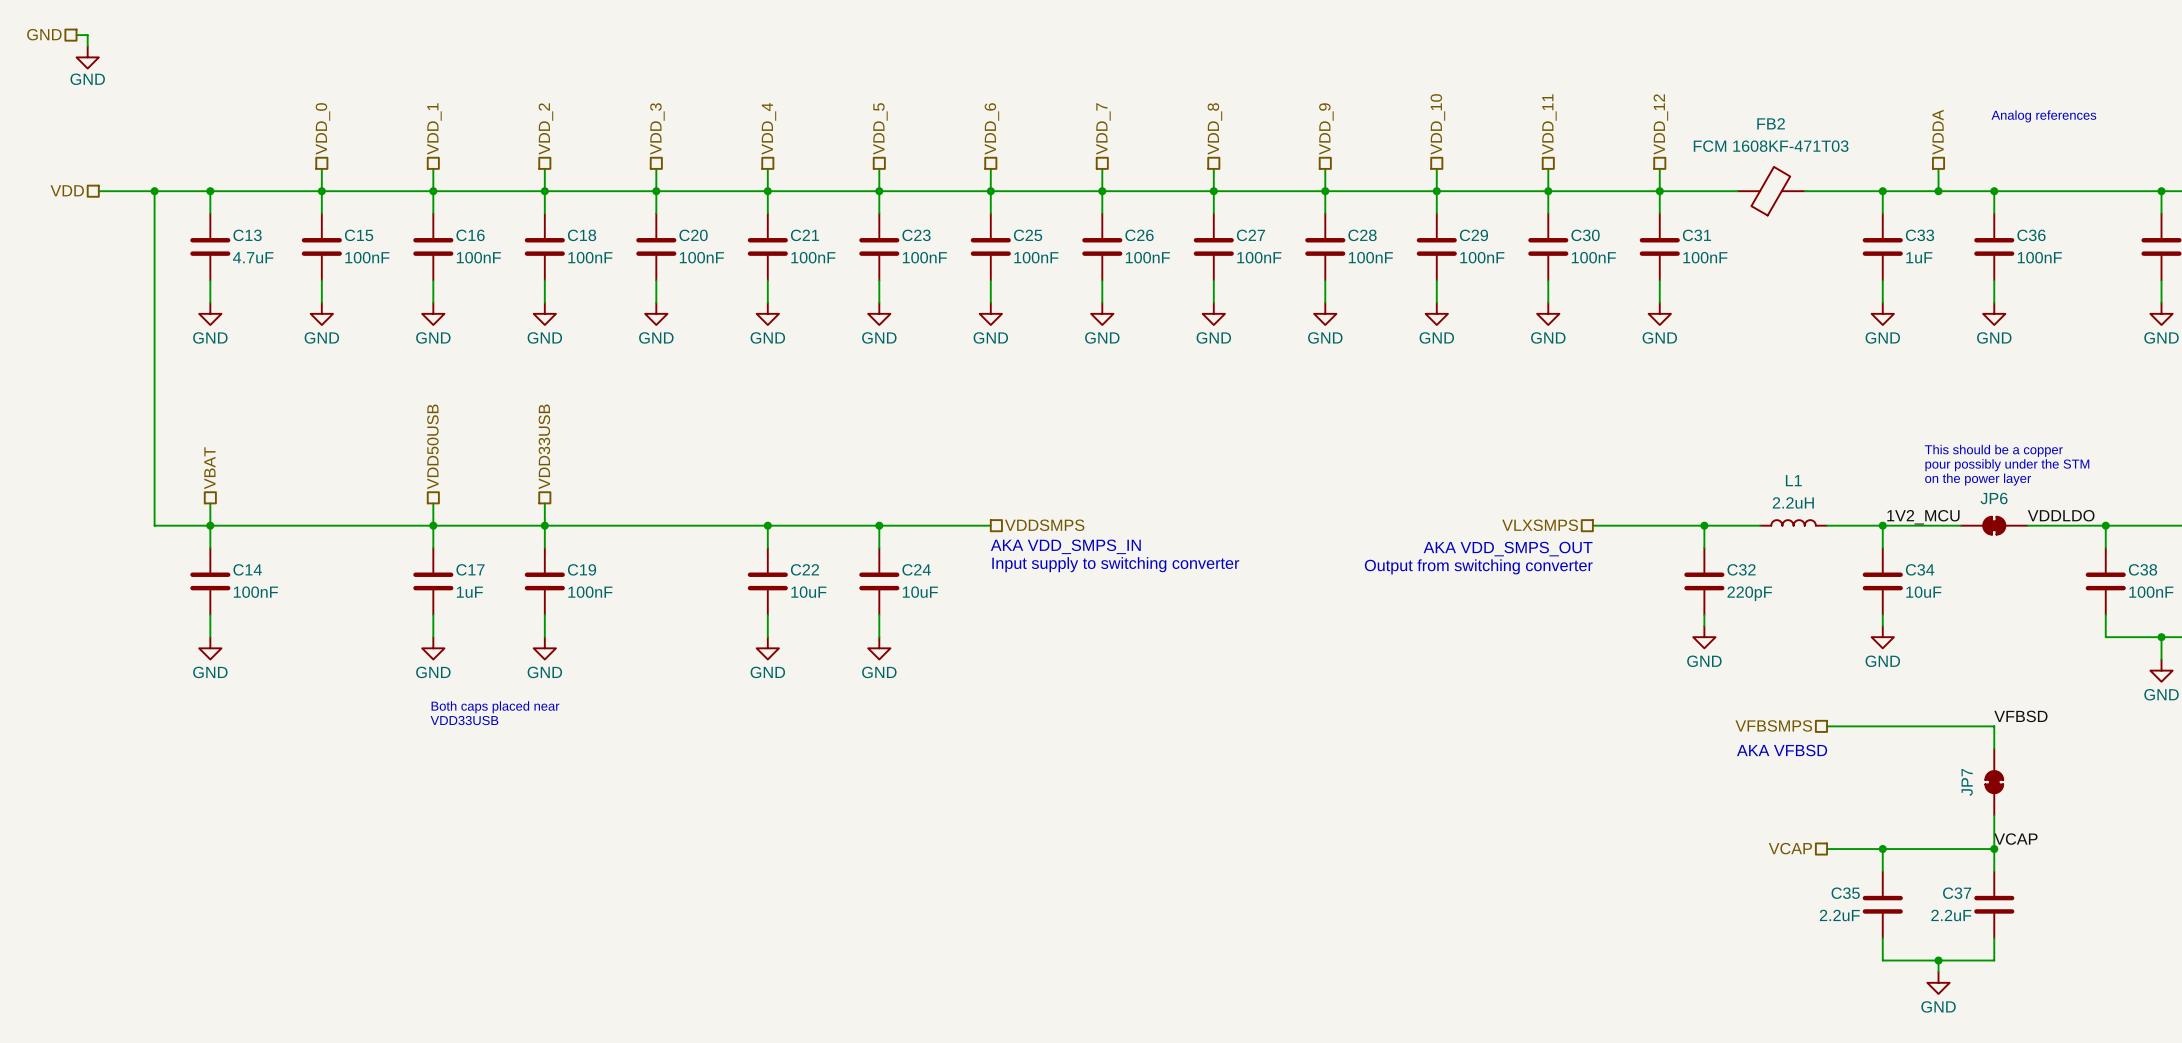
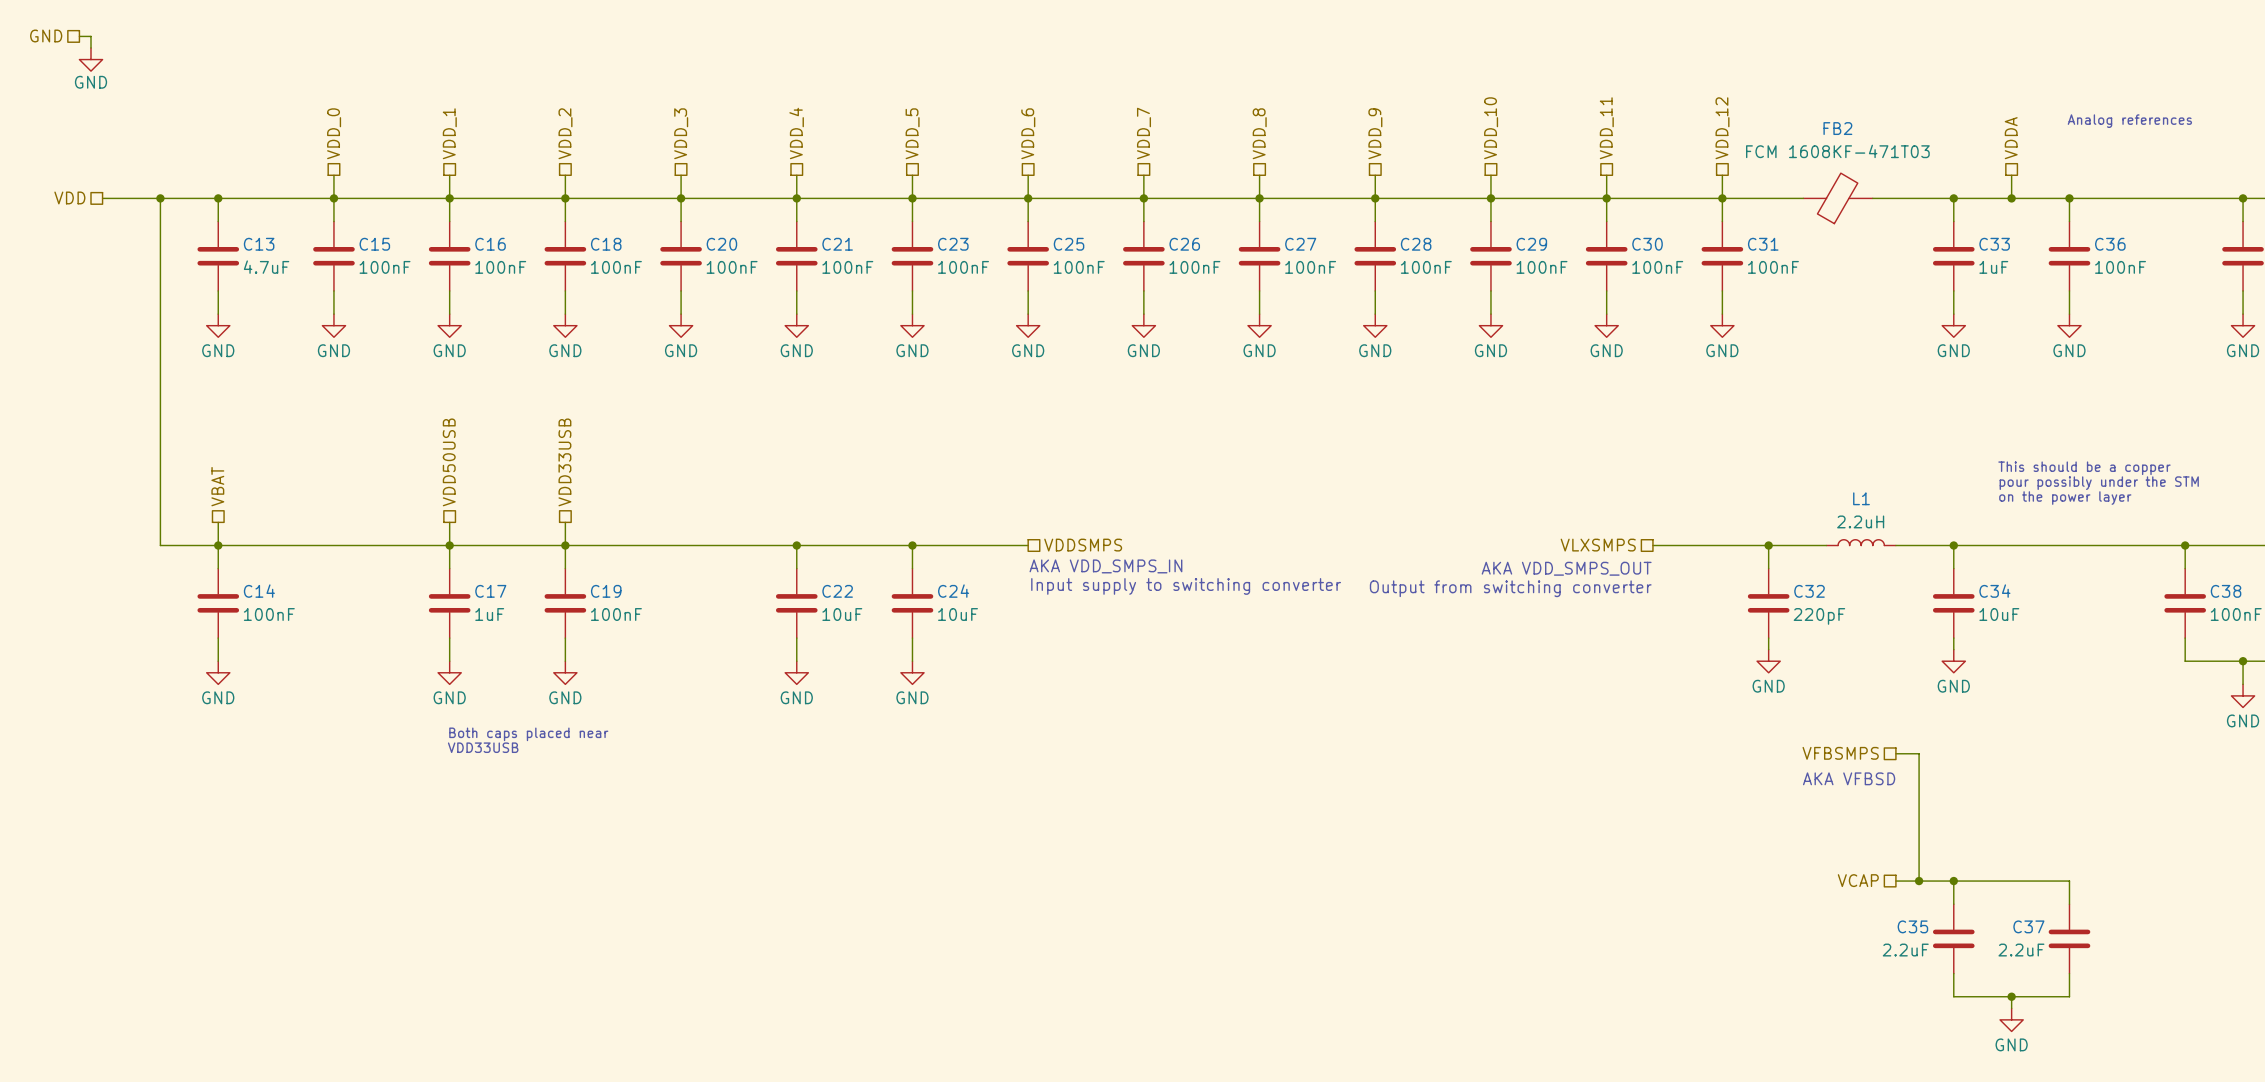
label: VDDLDO (2061, 515) -> none
label: 1V2_MCU (1923, 517) -> none
JP6: (1994, 525) -> none
label: VFBSD (2020, 716) -> none
wire: (1849, 726) (1994, 726) (1994, 748) -> (1919, 753) (1919, 881)
JP7: (1994, 782) -> none
wire: (1994, 815) (1994, 849) -> none
label: VCAP (2015, 839) -> none
junction: none -> (1919, 881)
junction: (1994, 849) -> none

